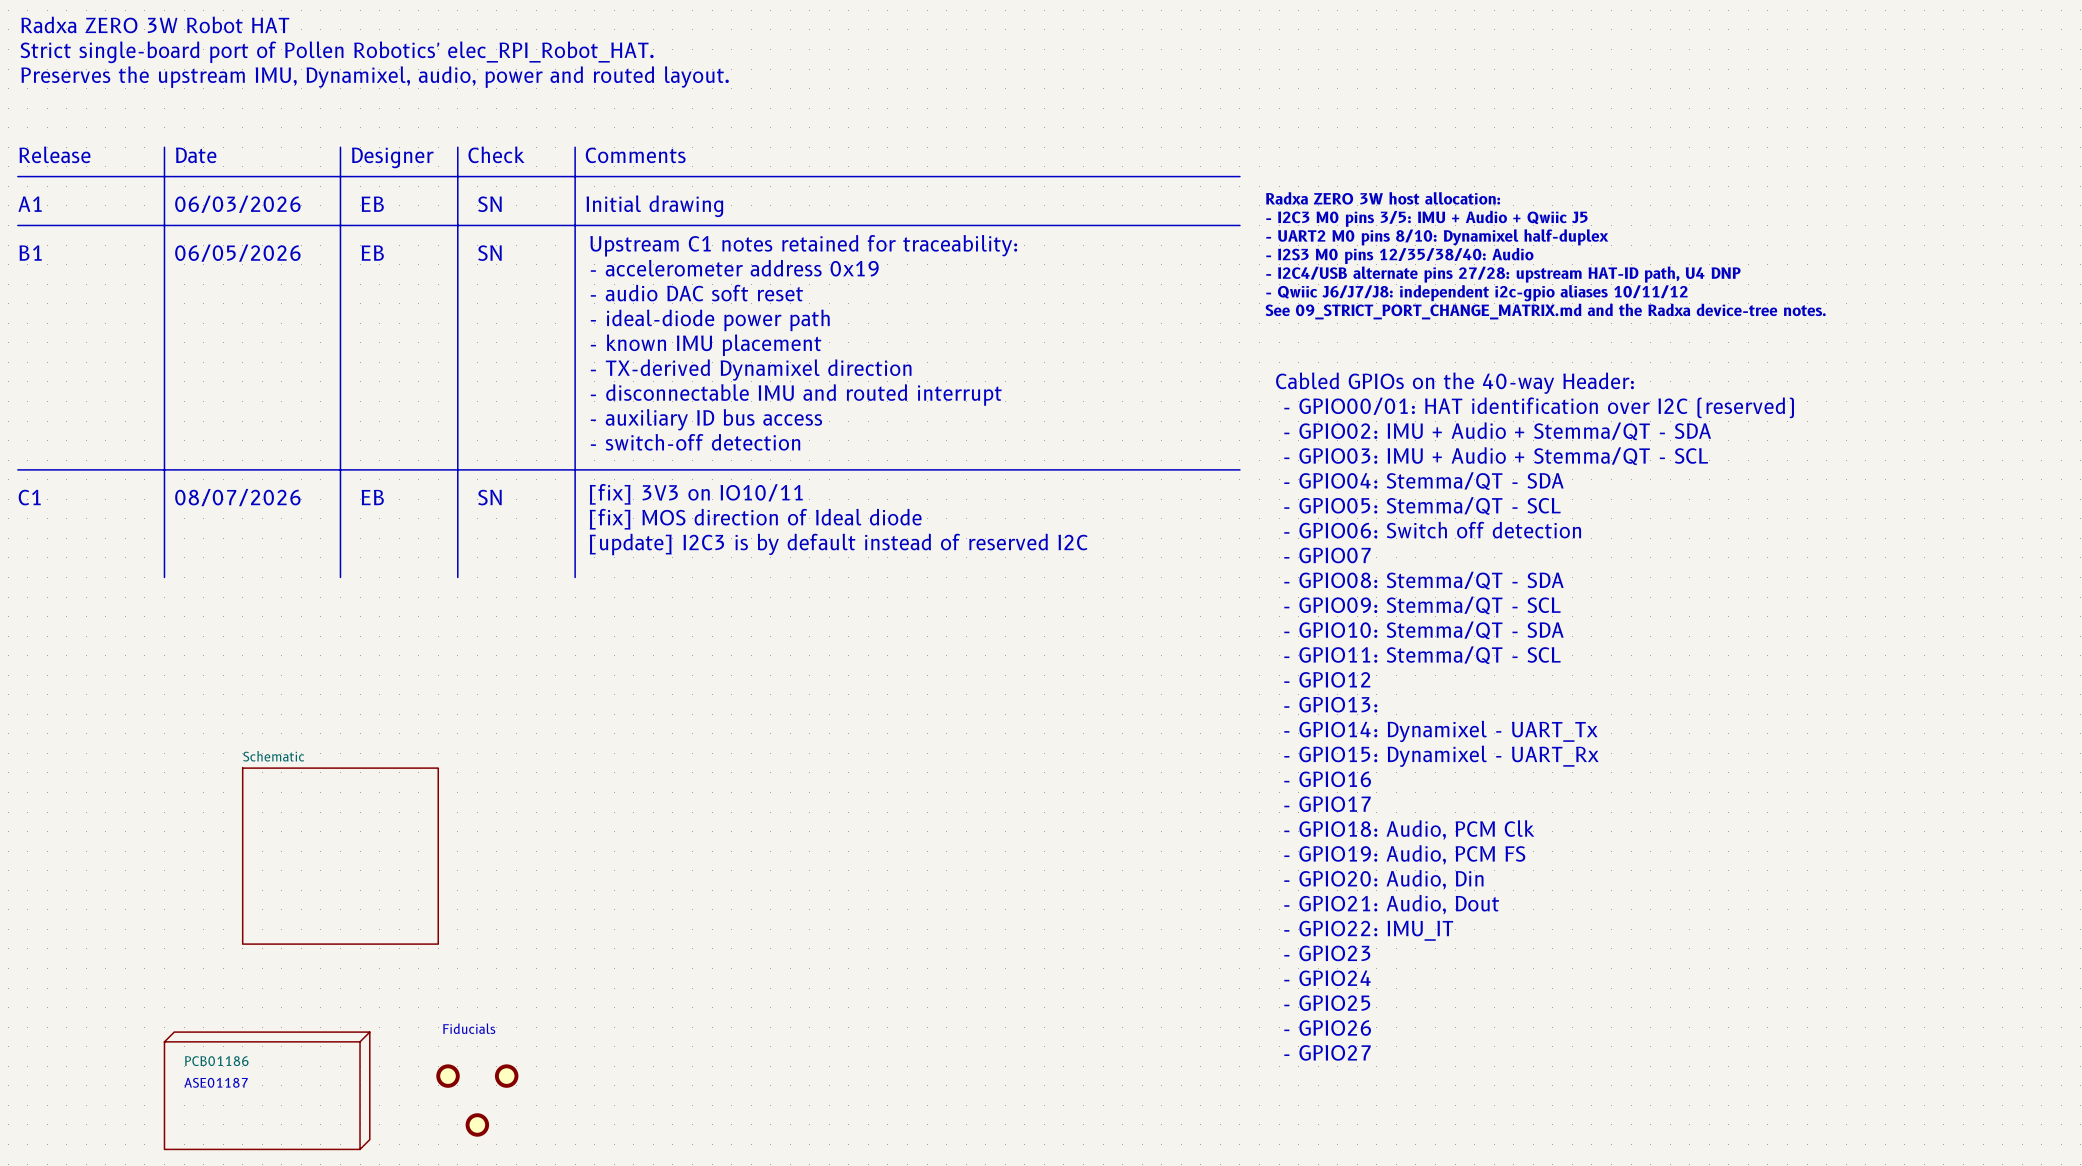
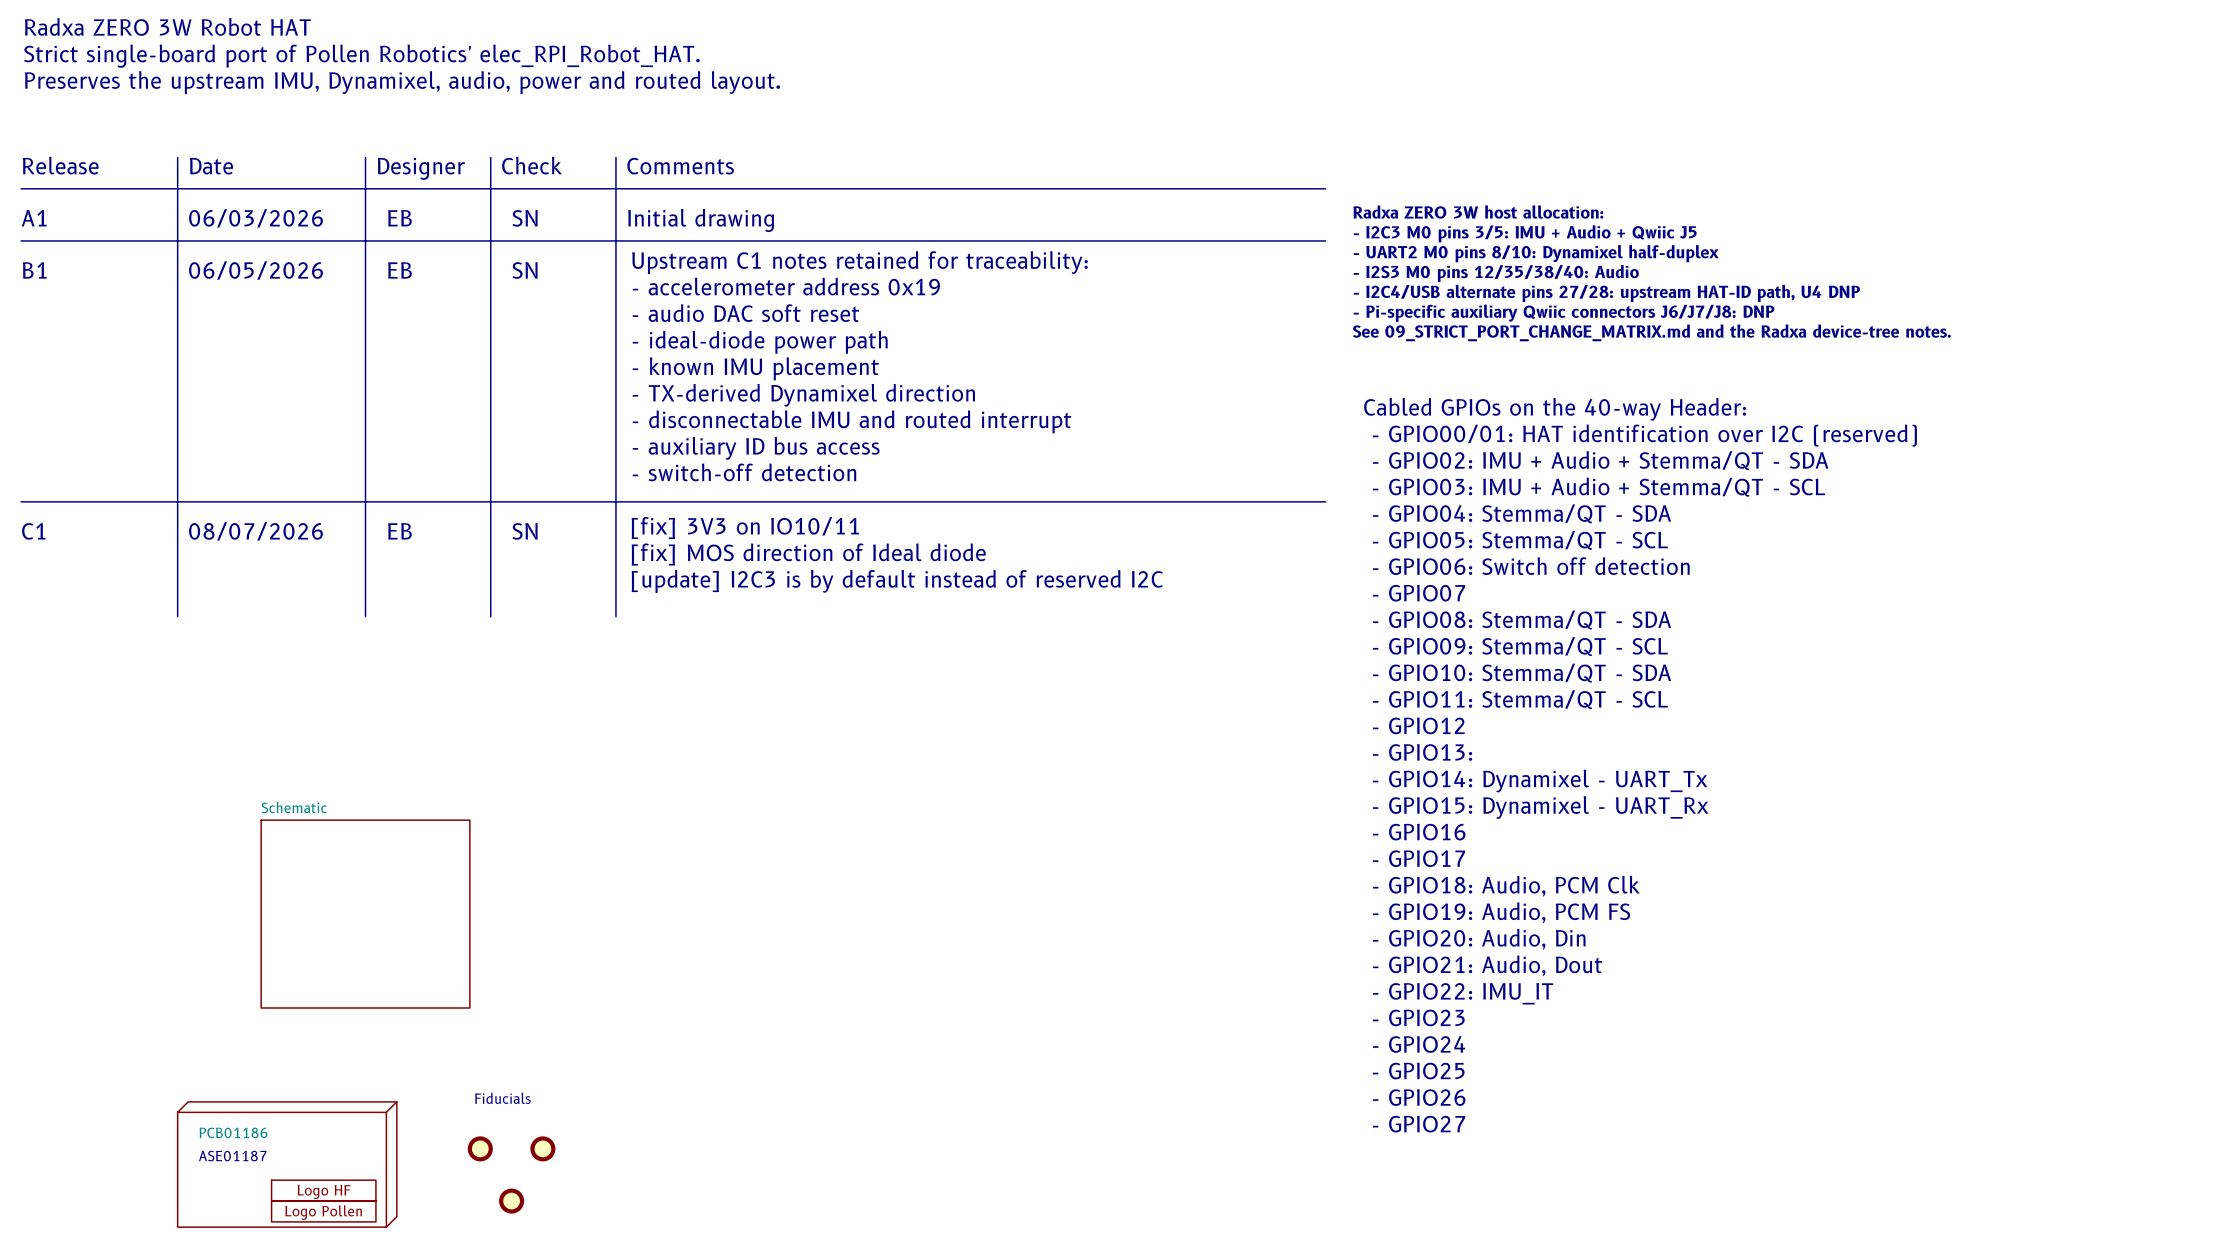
text: - Qwiic J6/J7/J8: independent i2c-gpio aliases 10/11/12 (1476, 293) -> - Pi-specific auxiliary Qwiic connectors J6/J7/J8: DNP (1564, 313)
part: none -> (323, 1190)
part: none -> (323, 1211)

